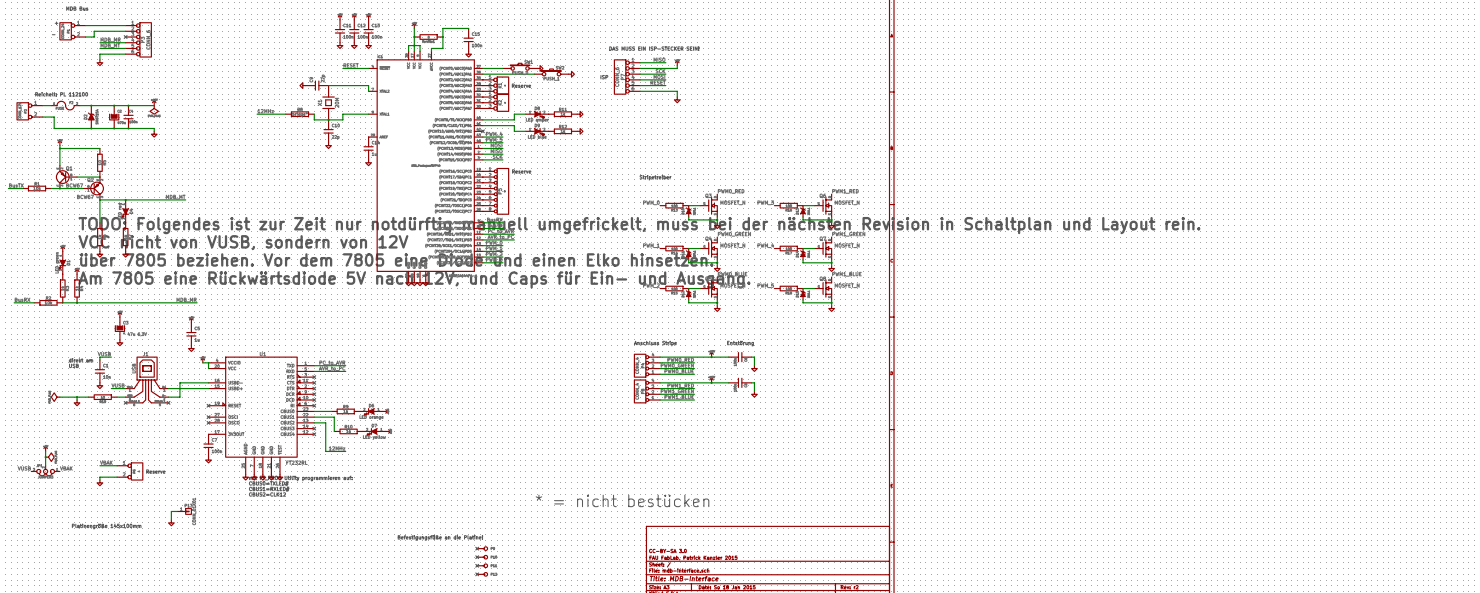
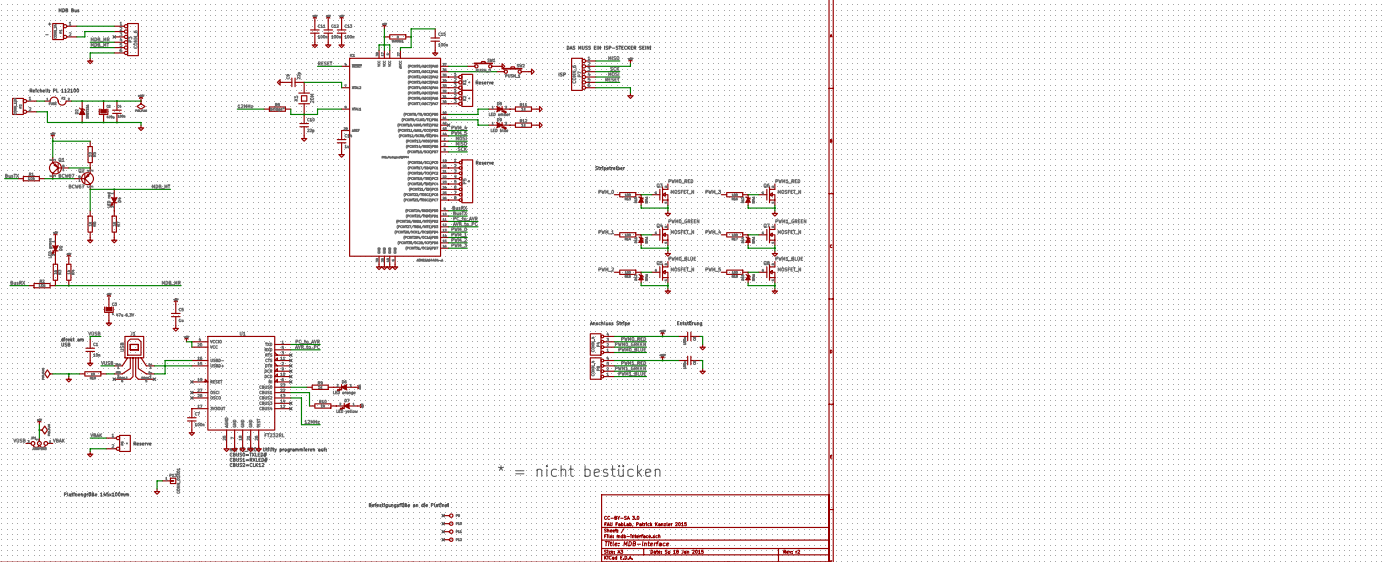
text: TODO: Folgendes ist zur Zeit nur notdürftig manuell umgefrickelt, muss bei der nächsten Revision in Schaltplan und Layout rein. (639, 225) -> none
text: VCC nicht von VUSB, sondern von 12V (243, 242) -> none
text: über 7805 beziehen. Vor dem 7805 eine Diode und einen Elko hinsetzen. (396, 259) -> none
text: Am 7805 eine Rückwärtsdiode 5V nach 12V, und Caps für Ein- und Ausgang. (414, 279) -> none

